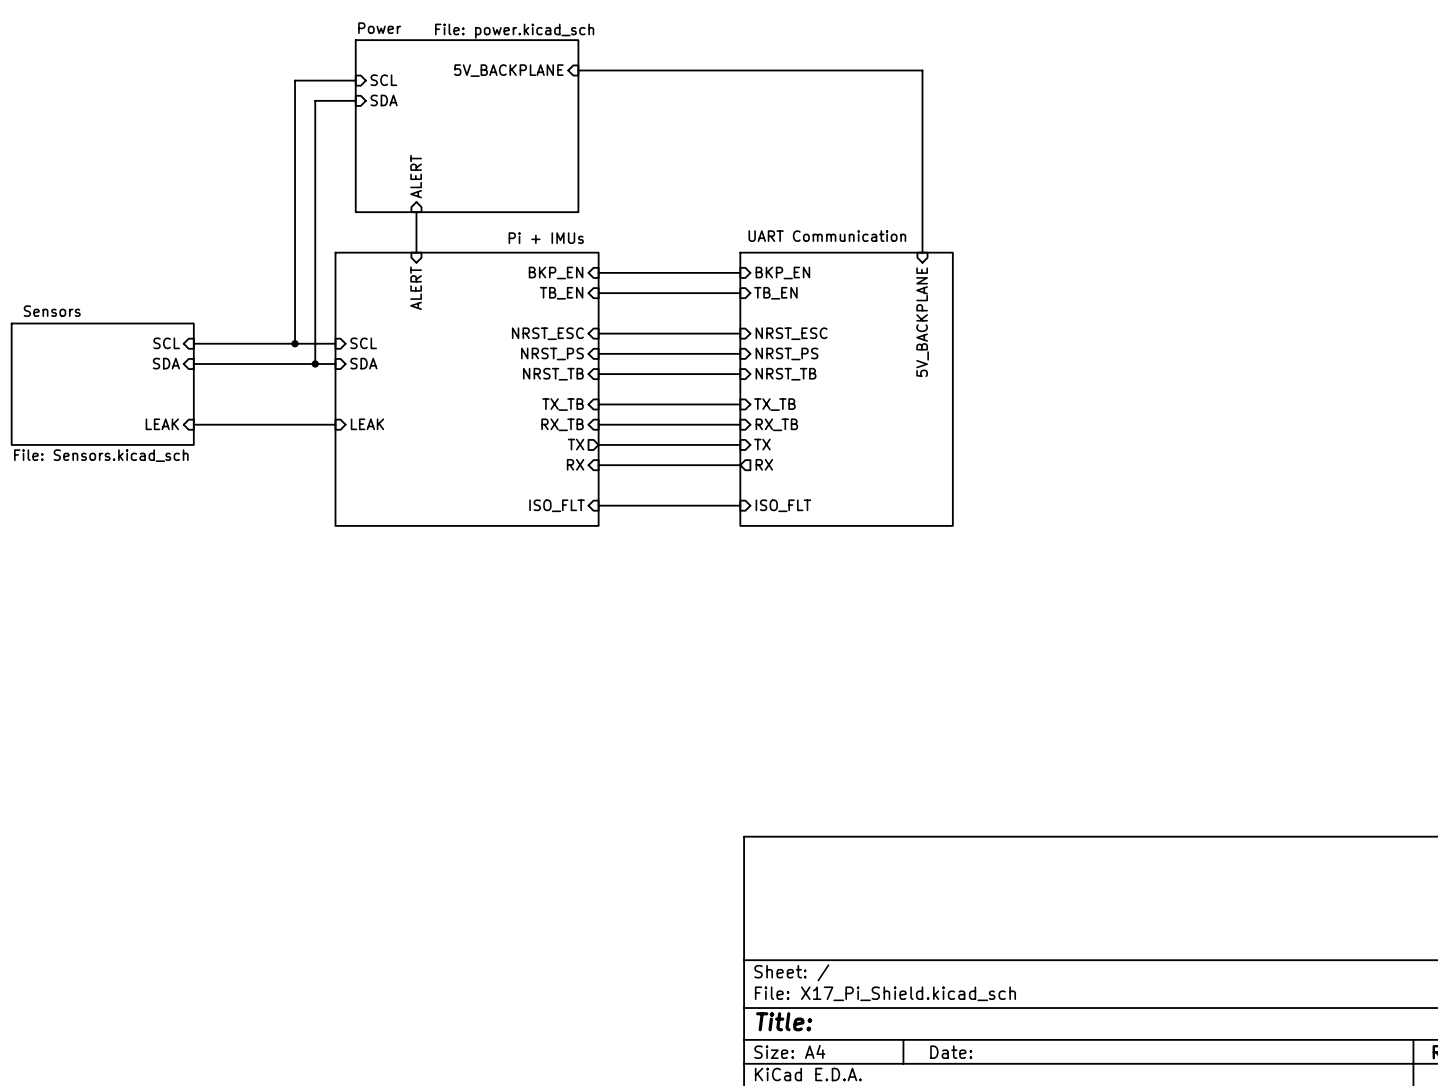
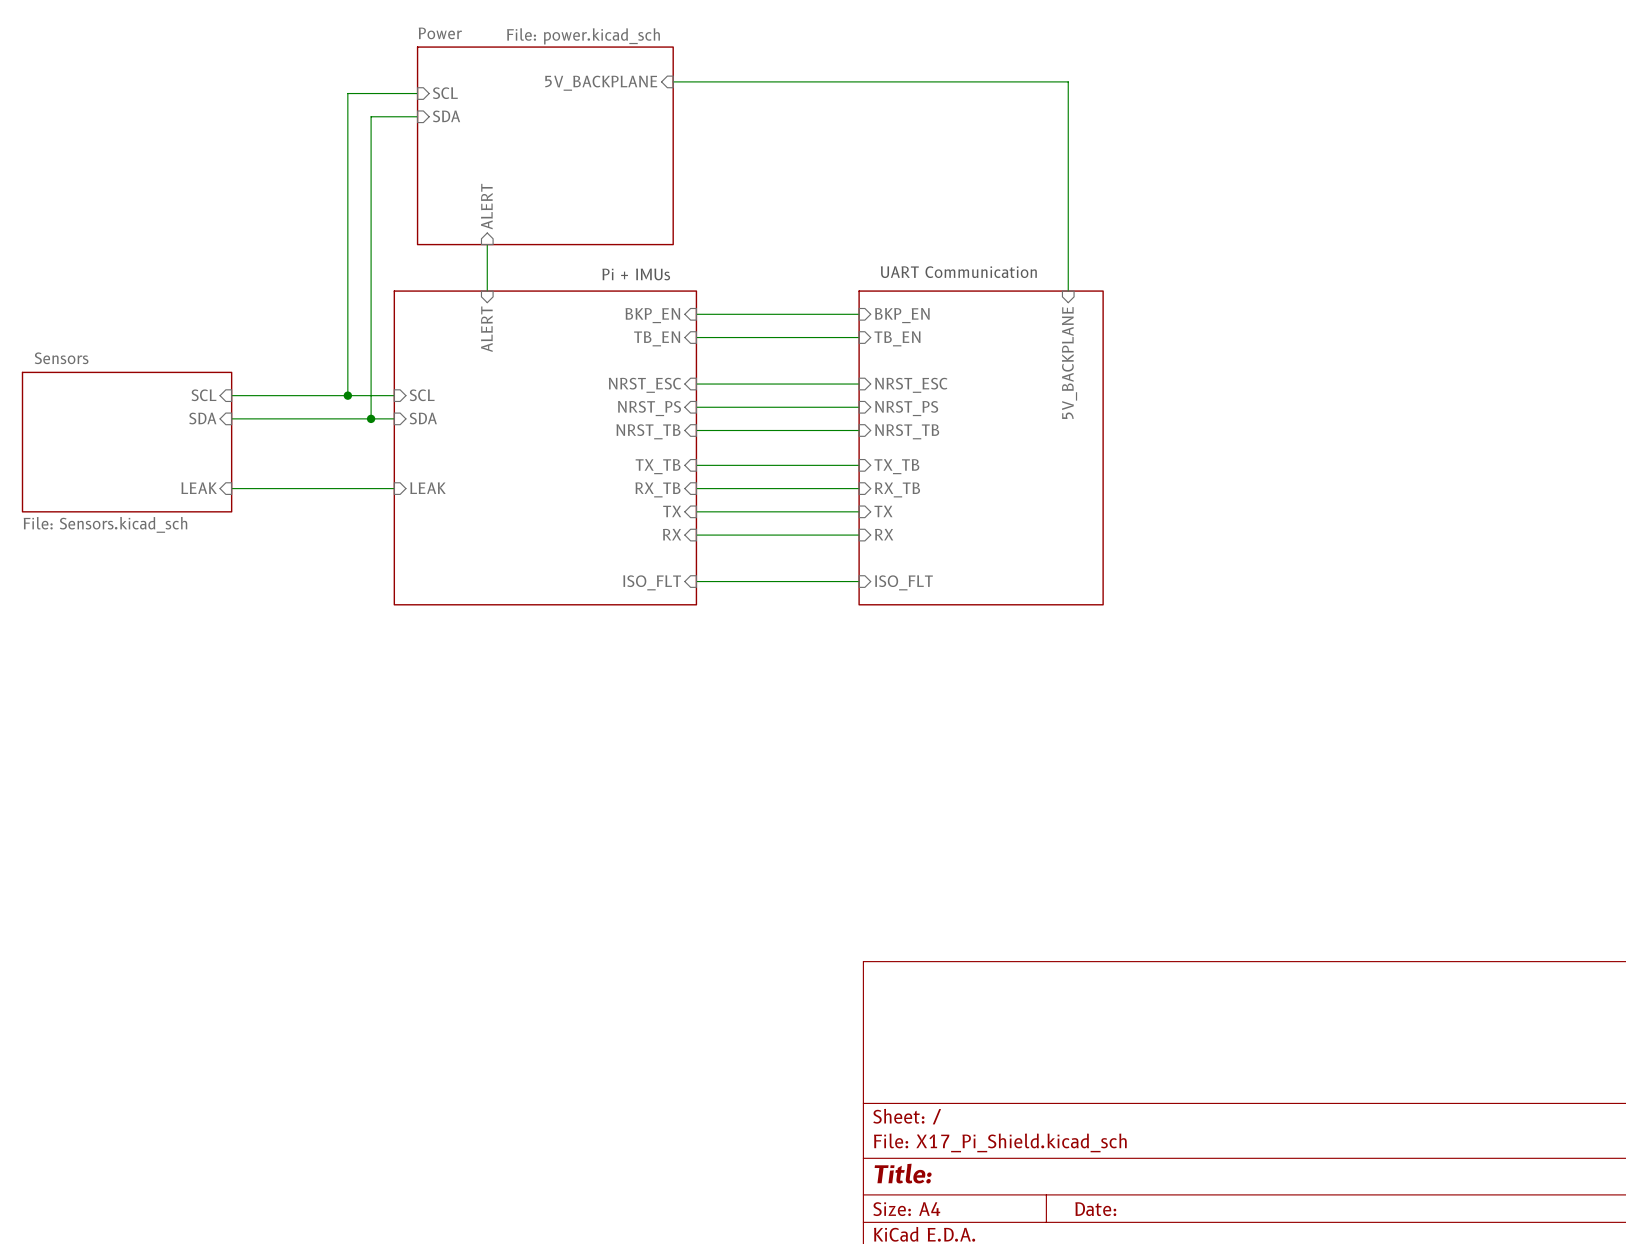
sheet pin shape: output (576, 444) -> input (672, 511)
sheet pin shape: output (764, 464) -> input (884, 534)

